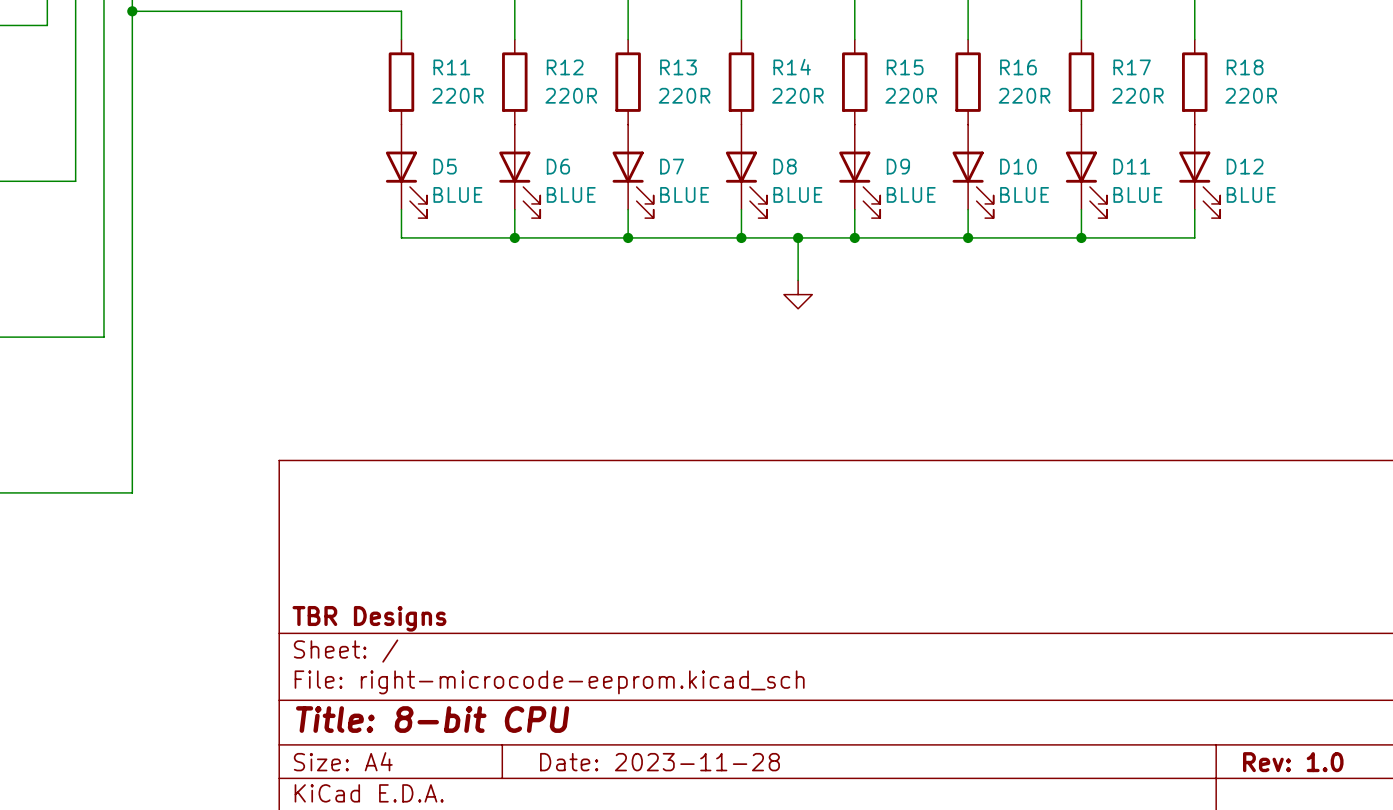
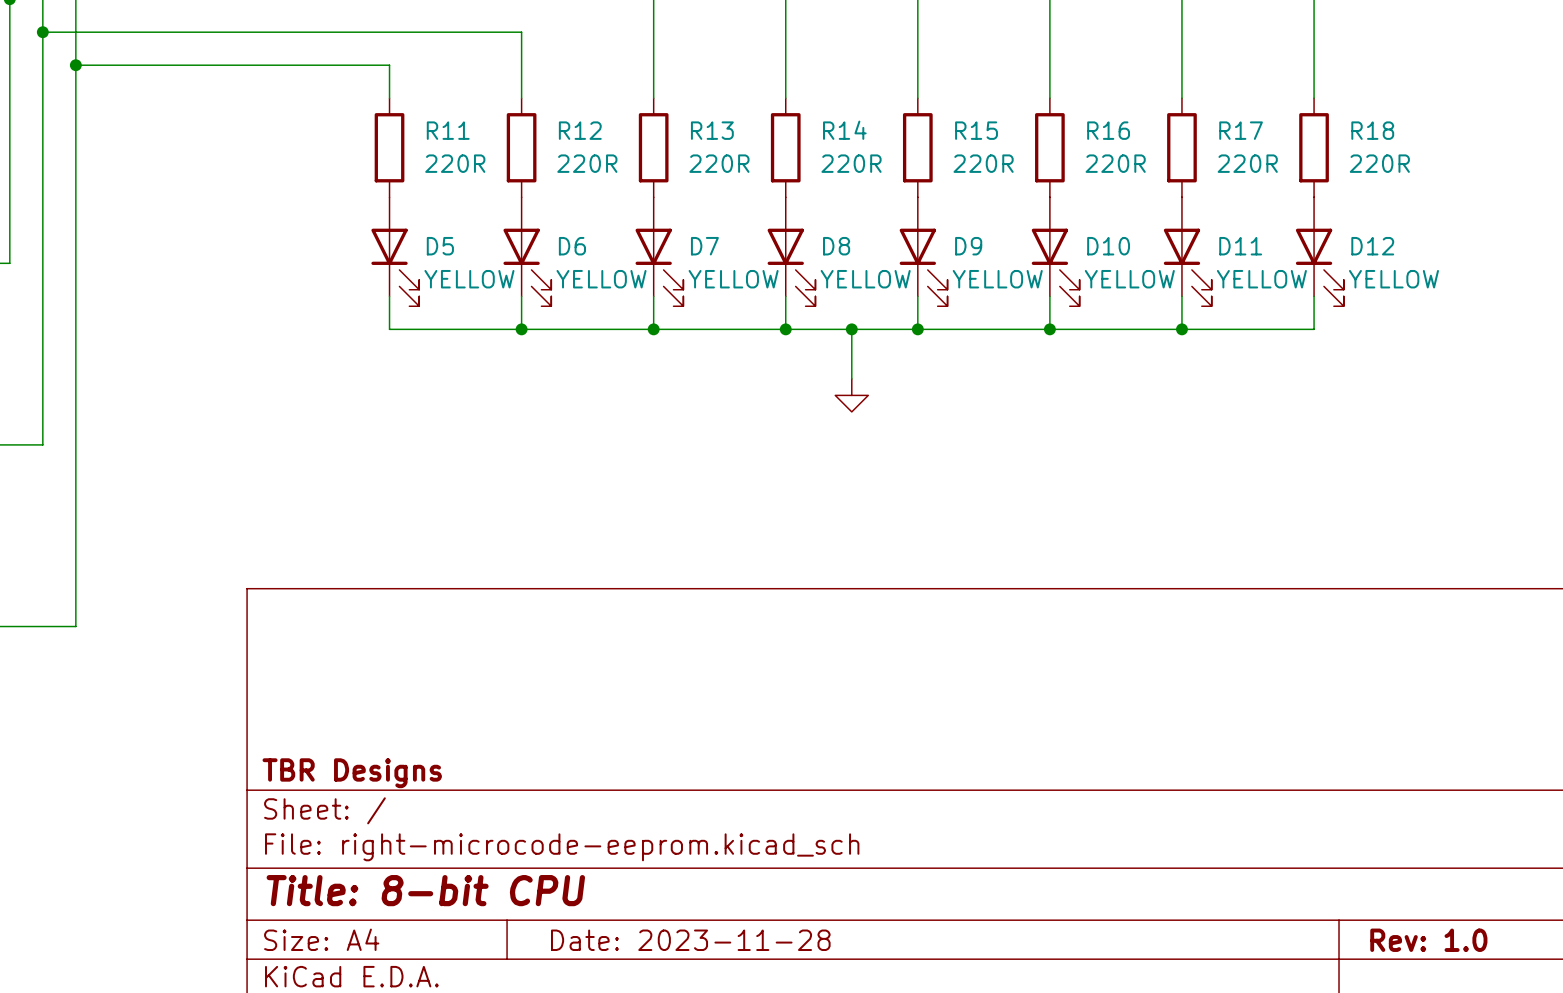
D5 value: BLUE (457, 194) -> YELLOW (469, 279)
D6 value: BLUE (571, 194) -> YELLOW (601, 279)
D7 value: BLUE (684, 194) -> YELLOW (733, 279)
D8 value: BLUE (797, 194) -> YELLOW (865, 279)
D9 value: BLUE (911, 194) -> YELLOW (997, 279)
D10 value: BLUE (1024, 194) -> YELLOW (1129, 279)
D11 value: BLUE (1137, 194) -> YELLOW (1261, 279)
D12 value: BLUE (1251, 194) -> YELLOW (1393, 279)

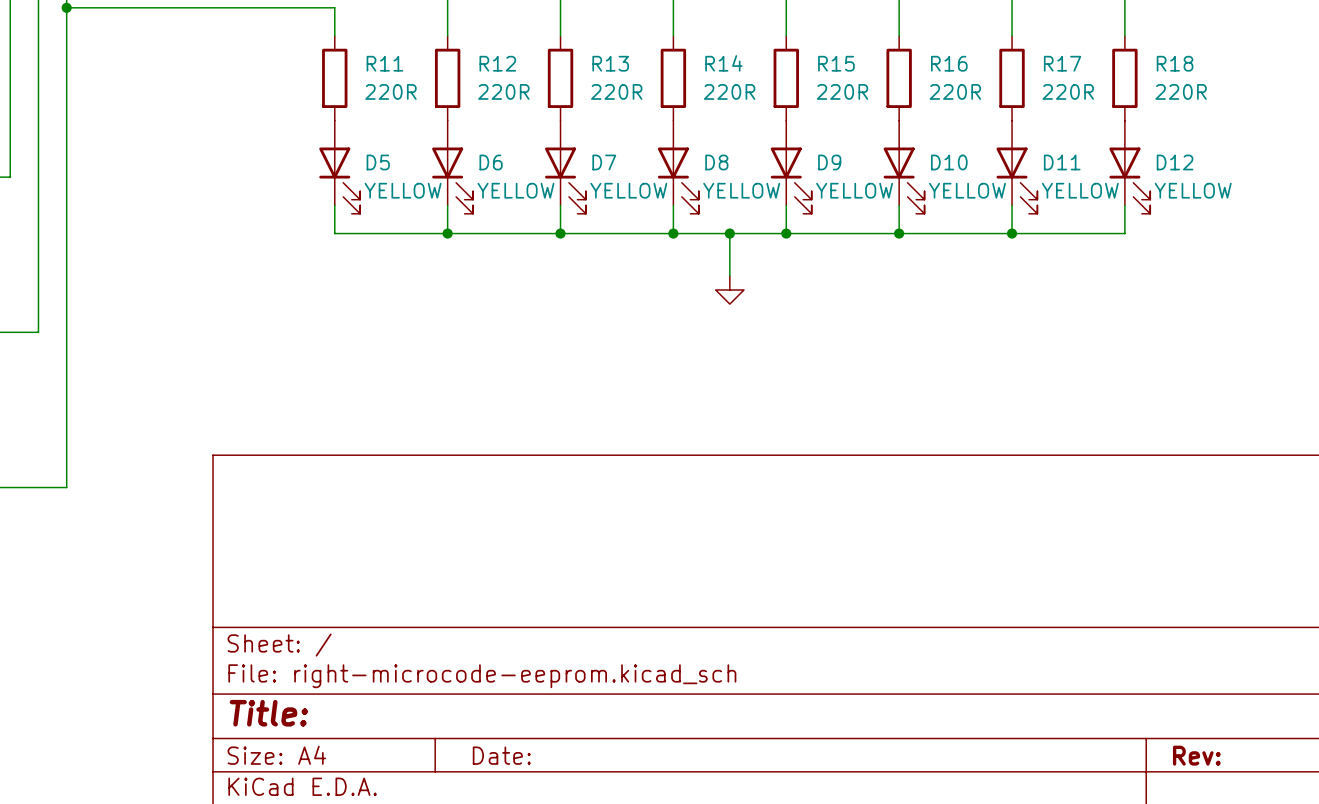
title block: TBR Designs (352, 773) -> none
title block: Title: 8-bit CPU (425, 890) -> Title: (268, 713)
title block: Date: 2023-11-28 (690, 940) -> Date: (501, 755)
title block: Rev: 1.0 (1428, 940) -> Rev: (1196, 755)

